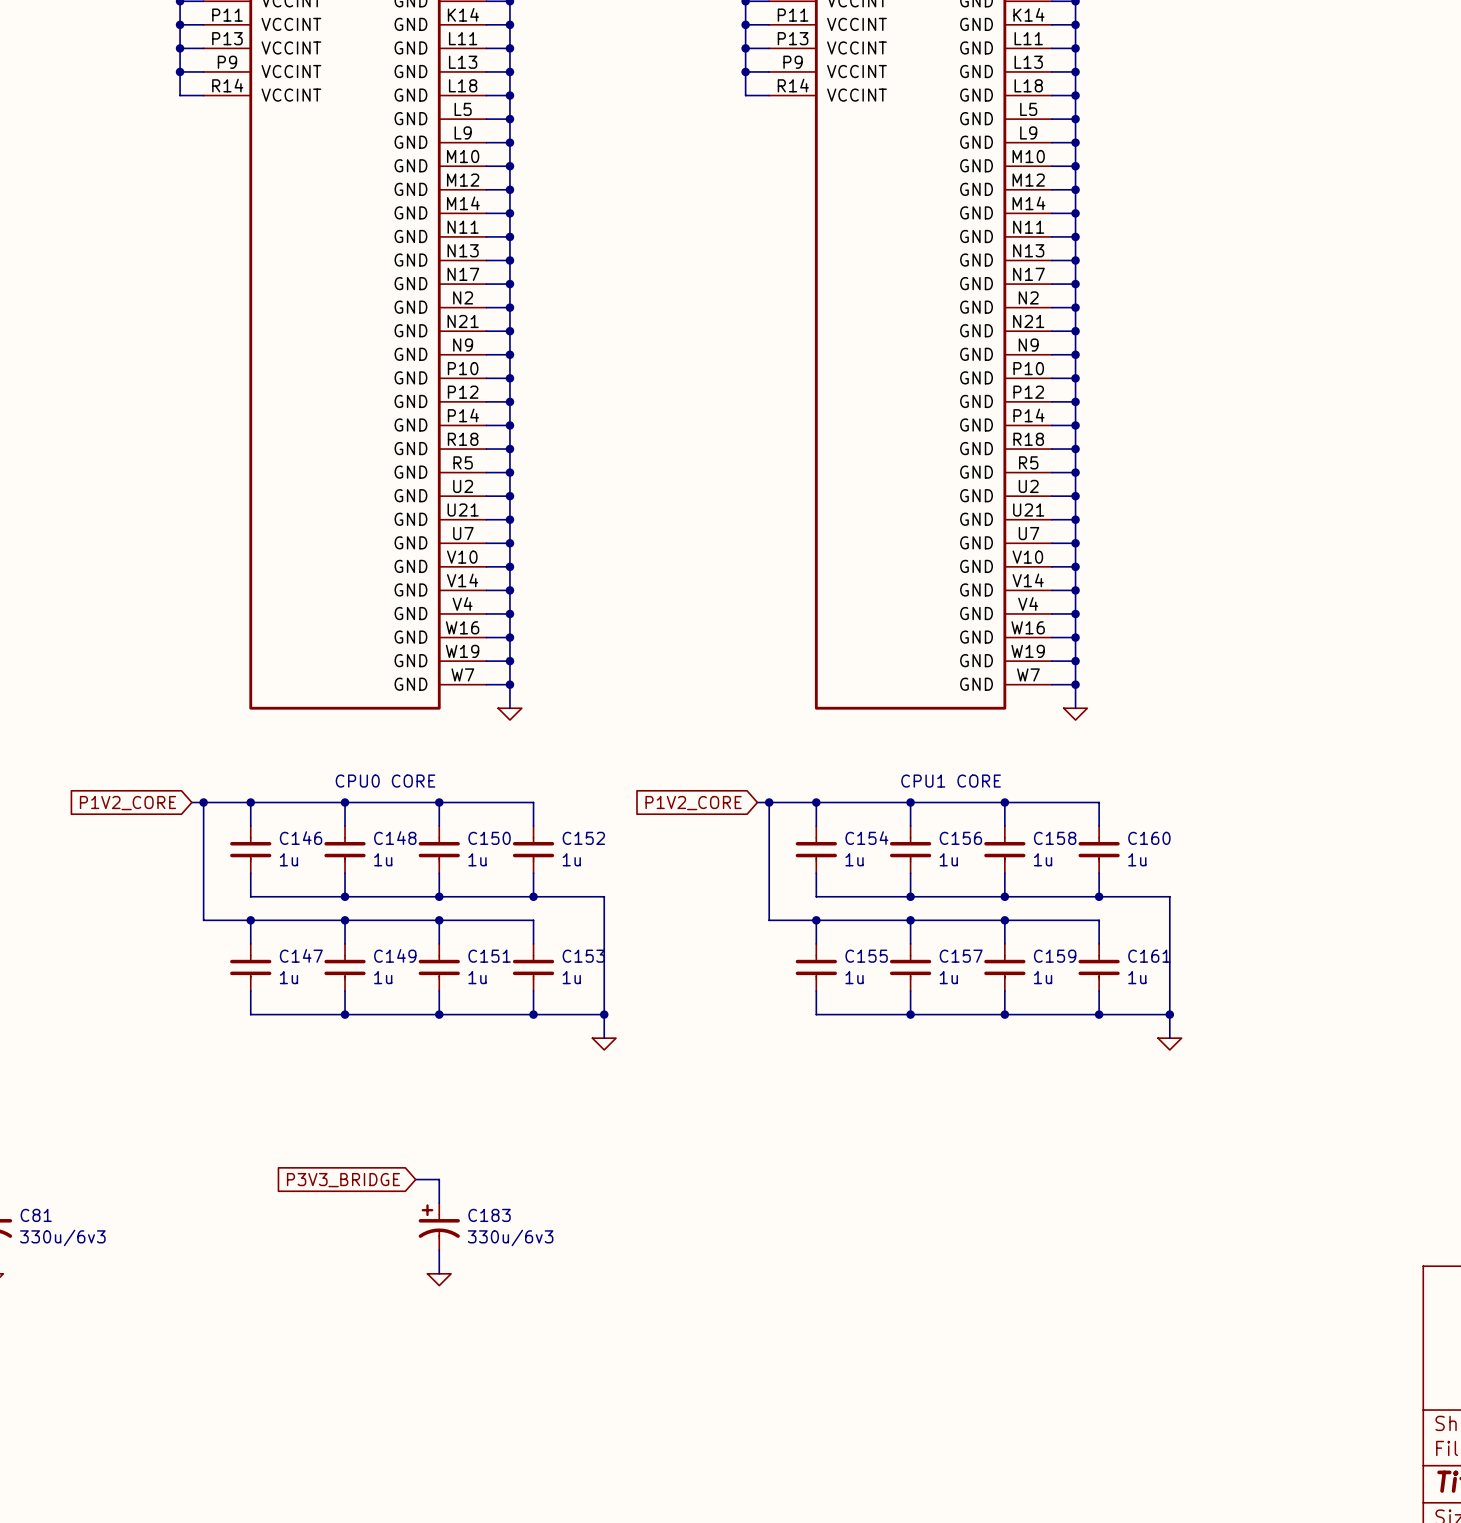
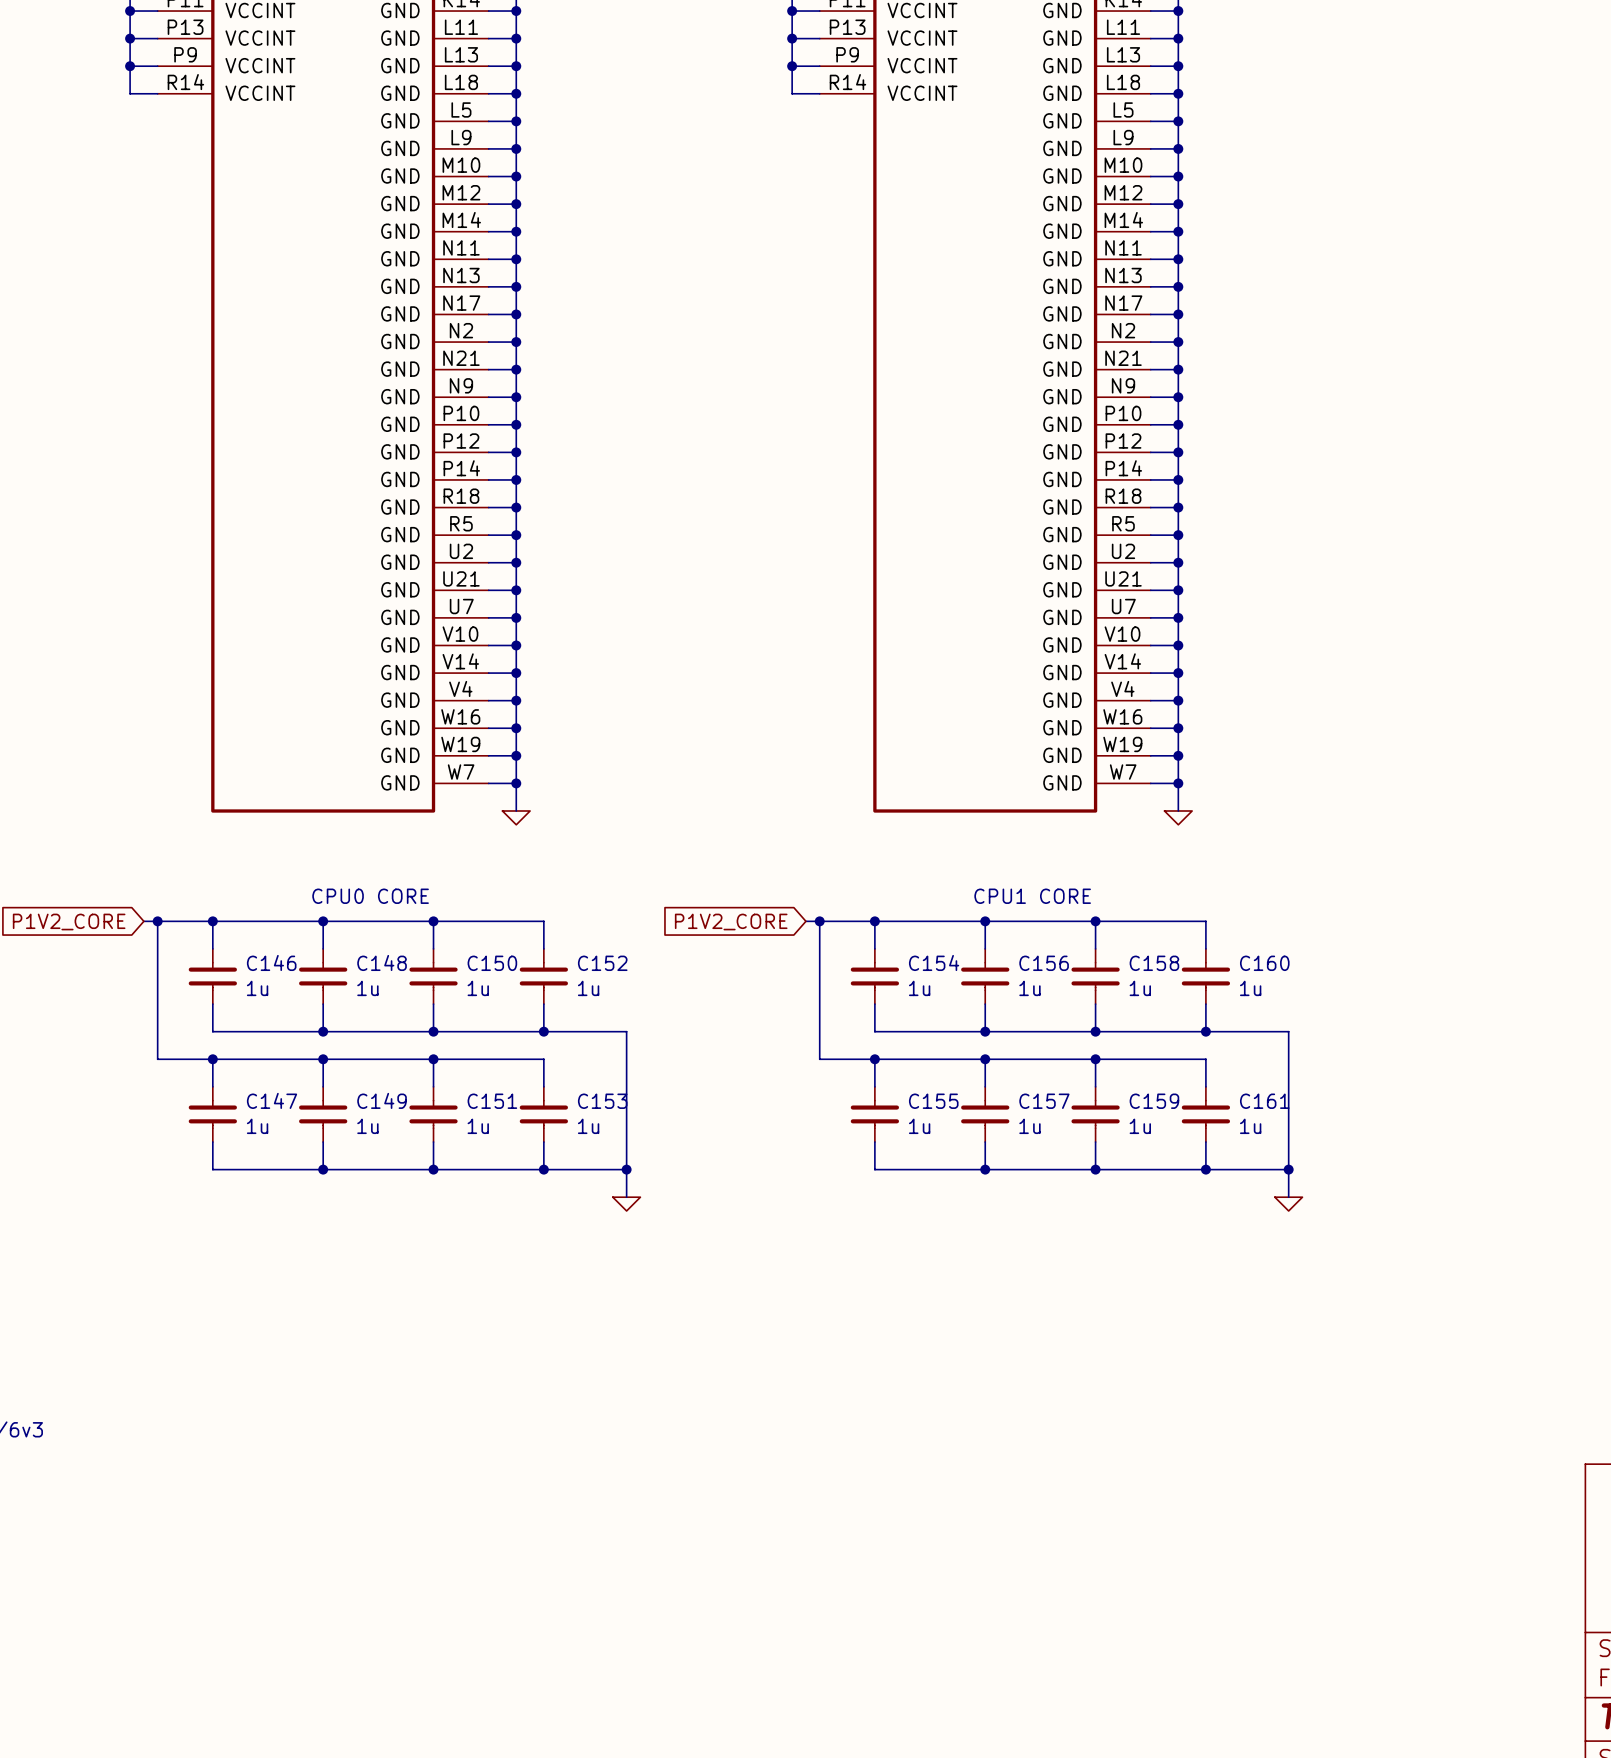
wire: (415, 1179) (439, 1179) (439, 1203) -> none
global label: P3V3_BRIDGE (343, 1180) -> none
C183: 330u/6v3 (439, 1226) -> none
wire: (439, 1250) (439, 1273) -> none
power symbol: (439, 1279) -> none

